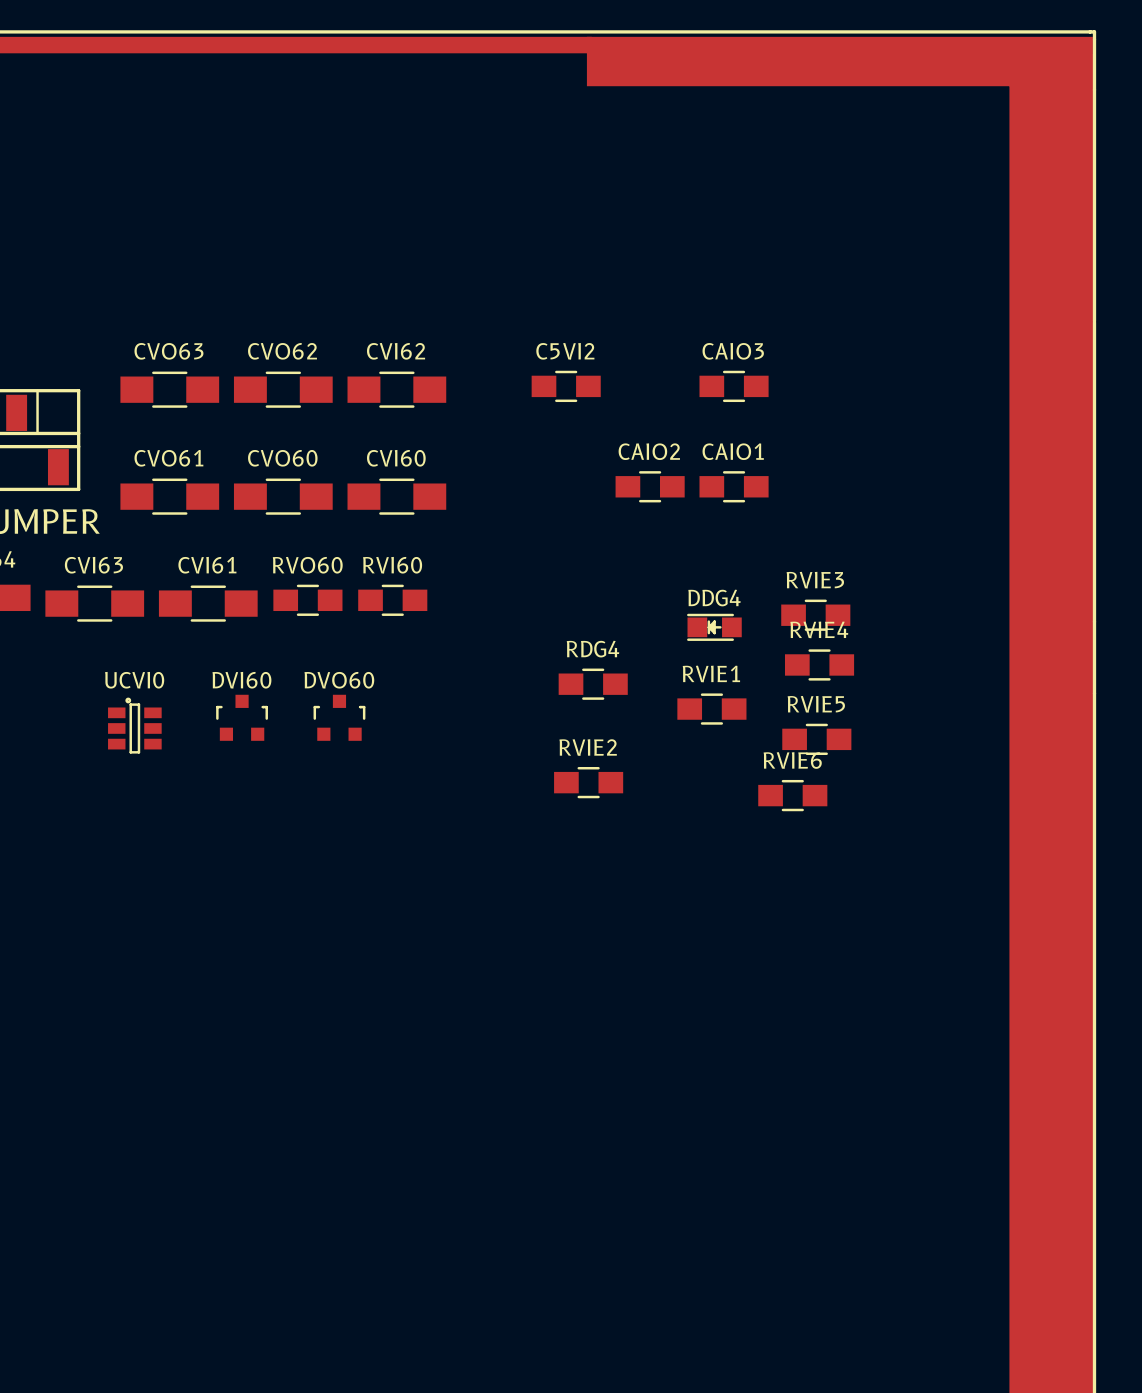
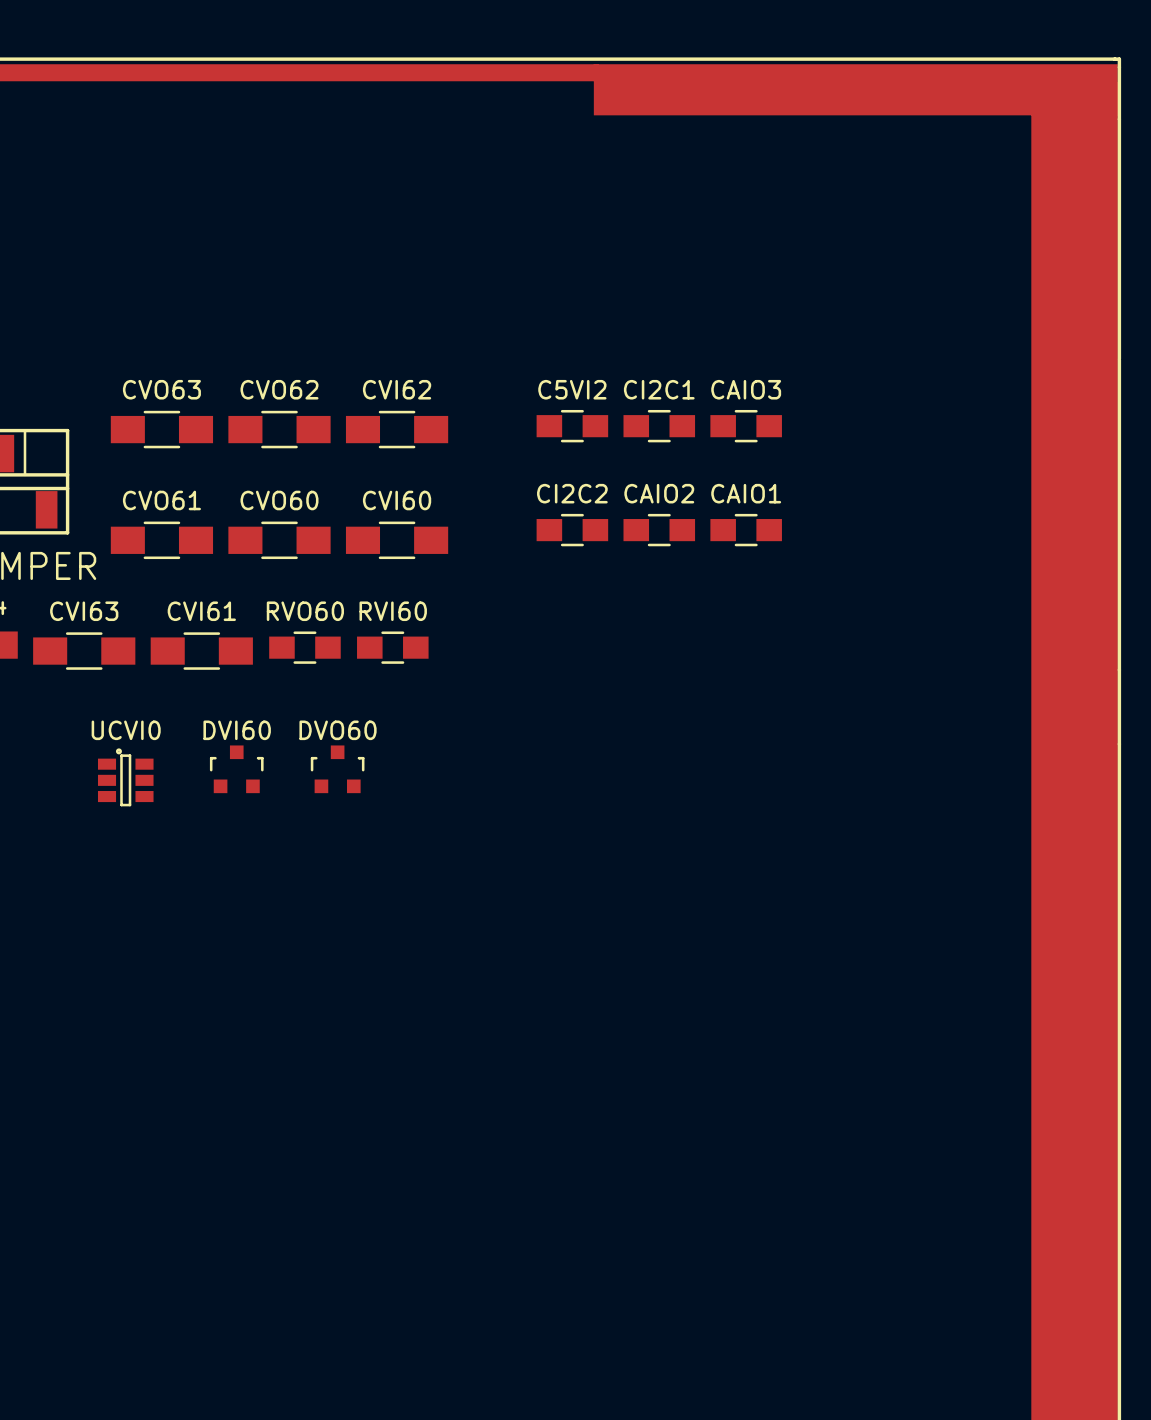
CI2C1: none -> (659, 426)
CI2C2: none -> (572, 530)
RVIE3: (815, 615) -> none
DDG4: (714, 627) -> none
RVIE4: (819, 664) -> none
RDG4: (593, 684) -> none
RVIE1: (711, 709) -> none
RVIE5: (816, 739) -> none
RVIE2: (588, 782) -> none
RVIE6: (792, 795) -> none

